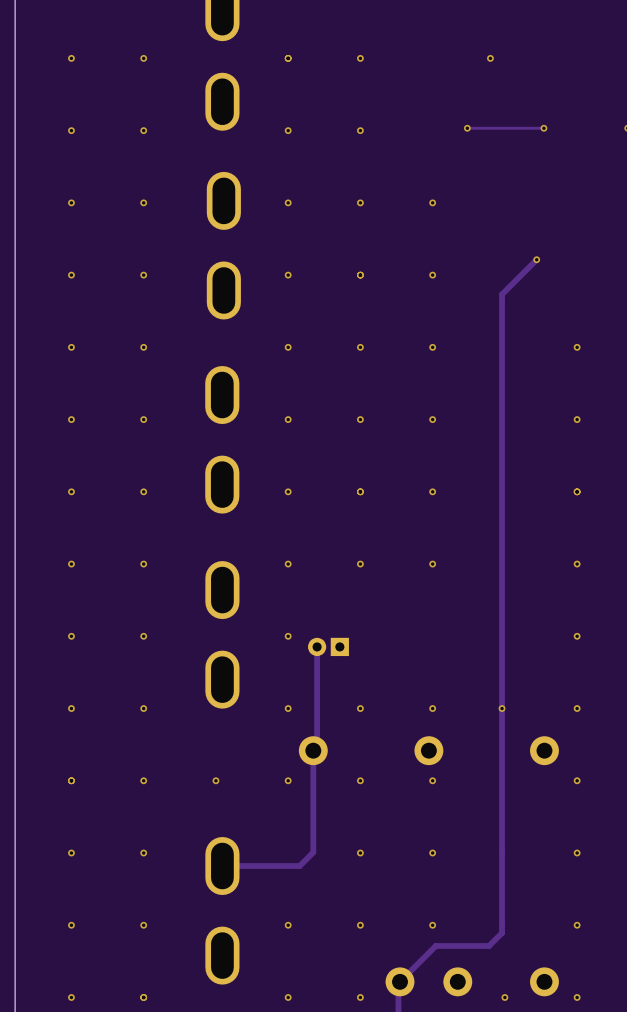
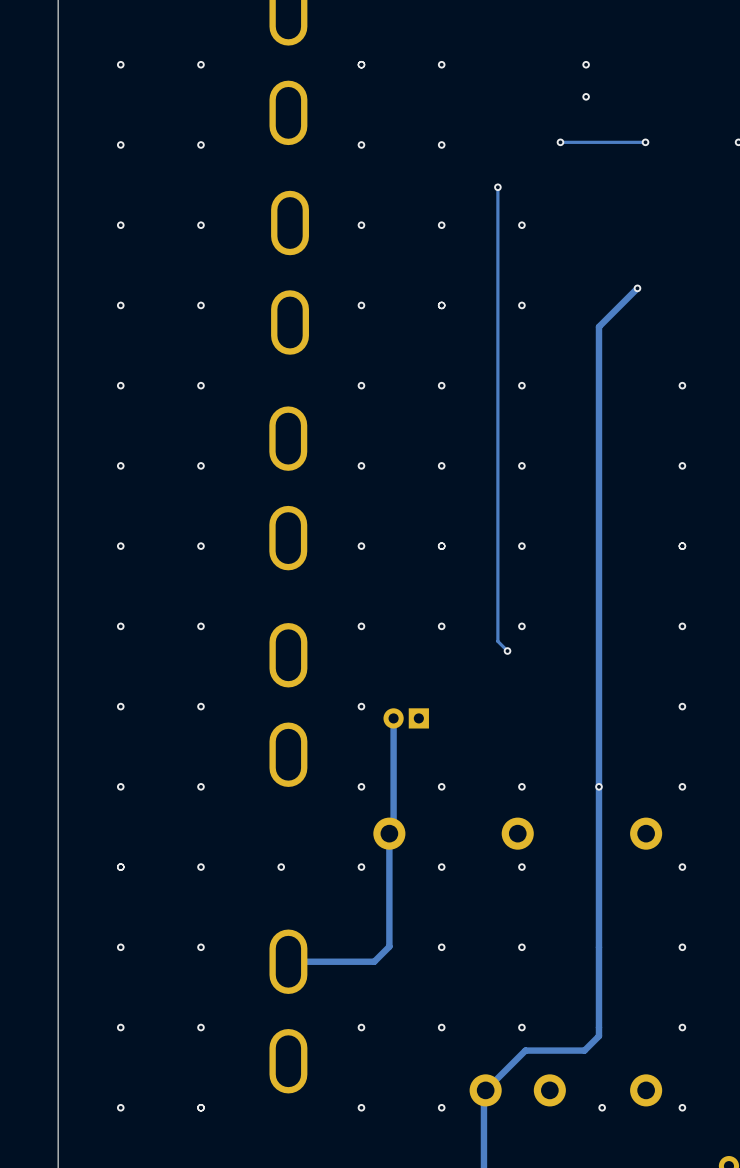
via: none -> (586, 96)
track: none -> (497, 187) (497, 641) (507, 651)
via: none -> (497, 187)
via: none -> (507, 651)

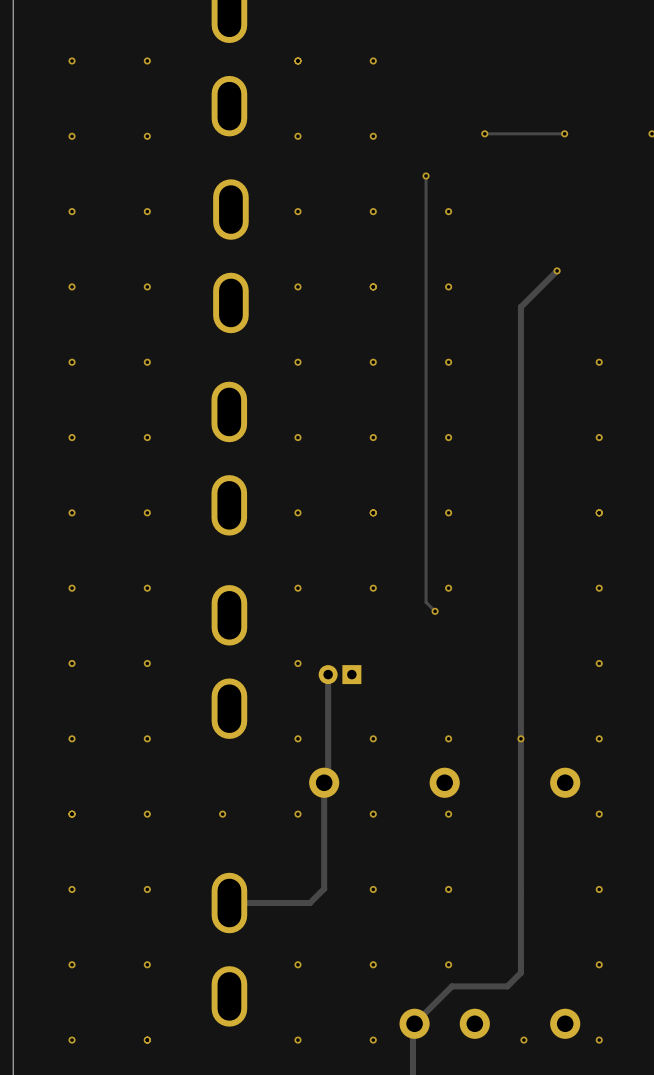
via: (586, 64) -> none
via: (586, 96) -> none

